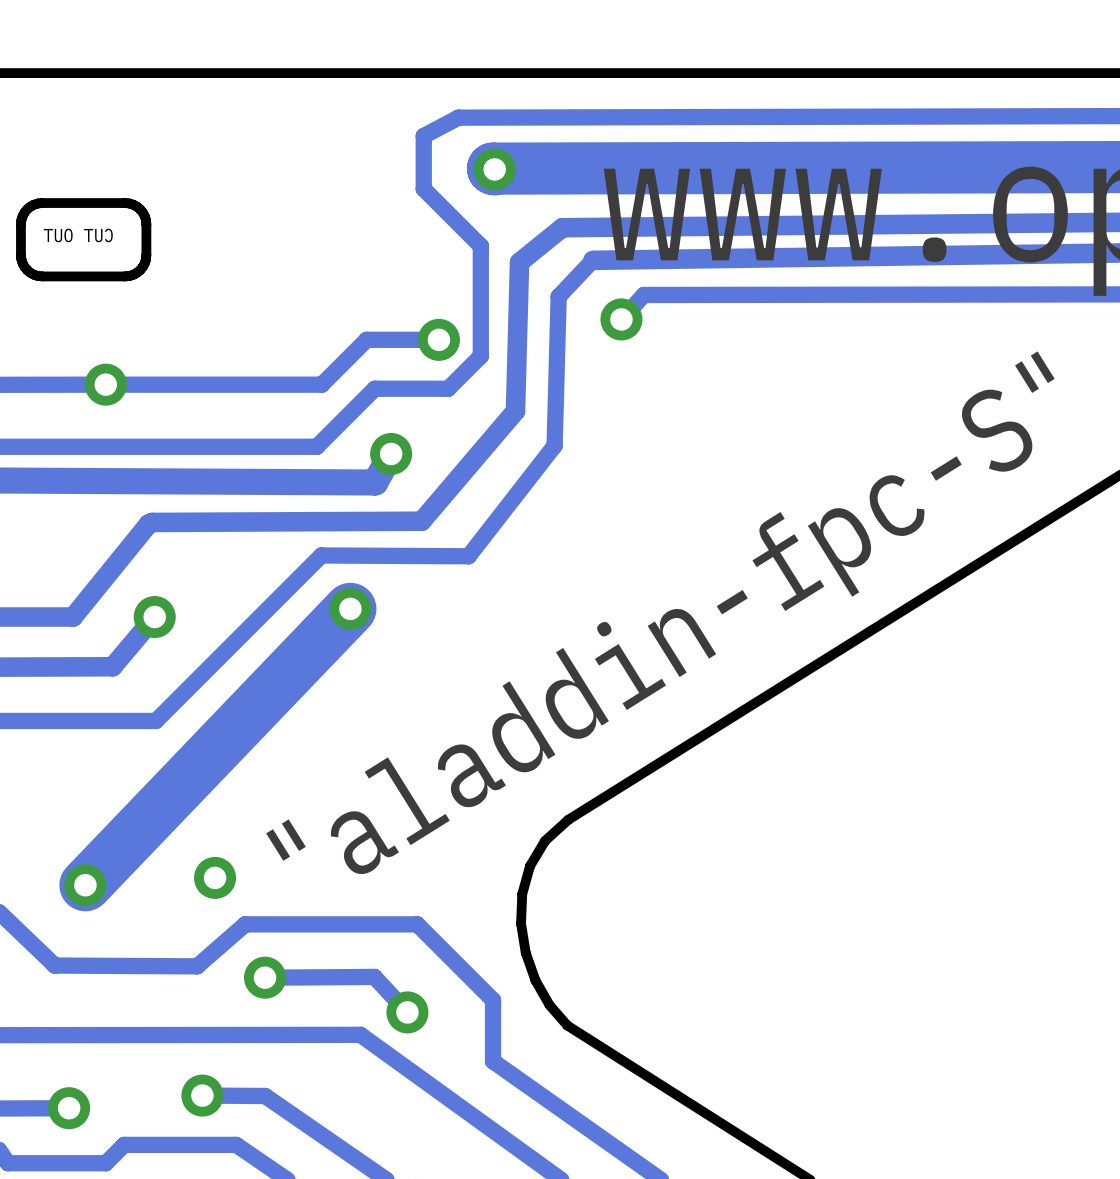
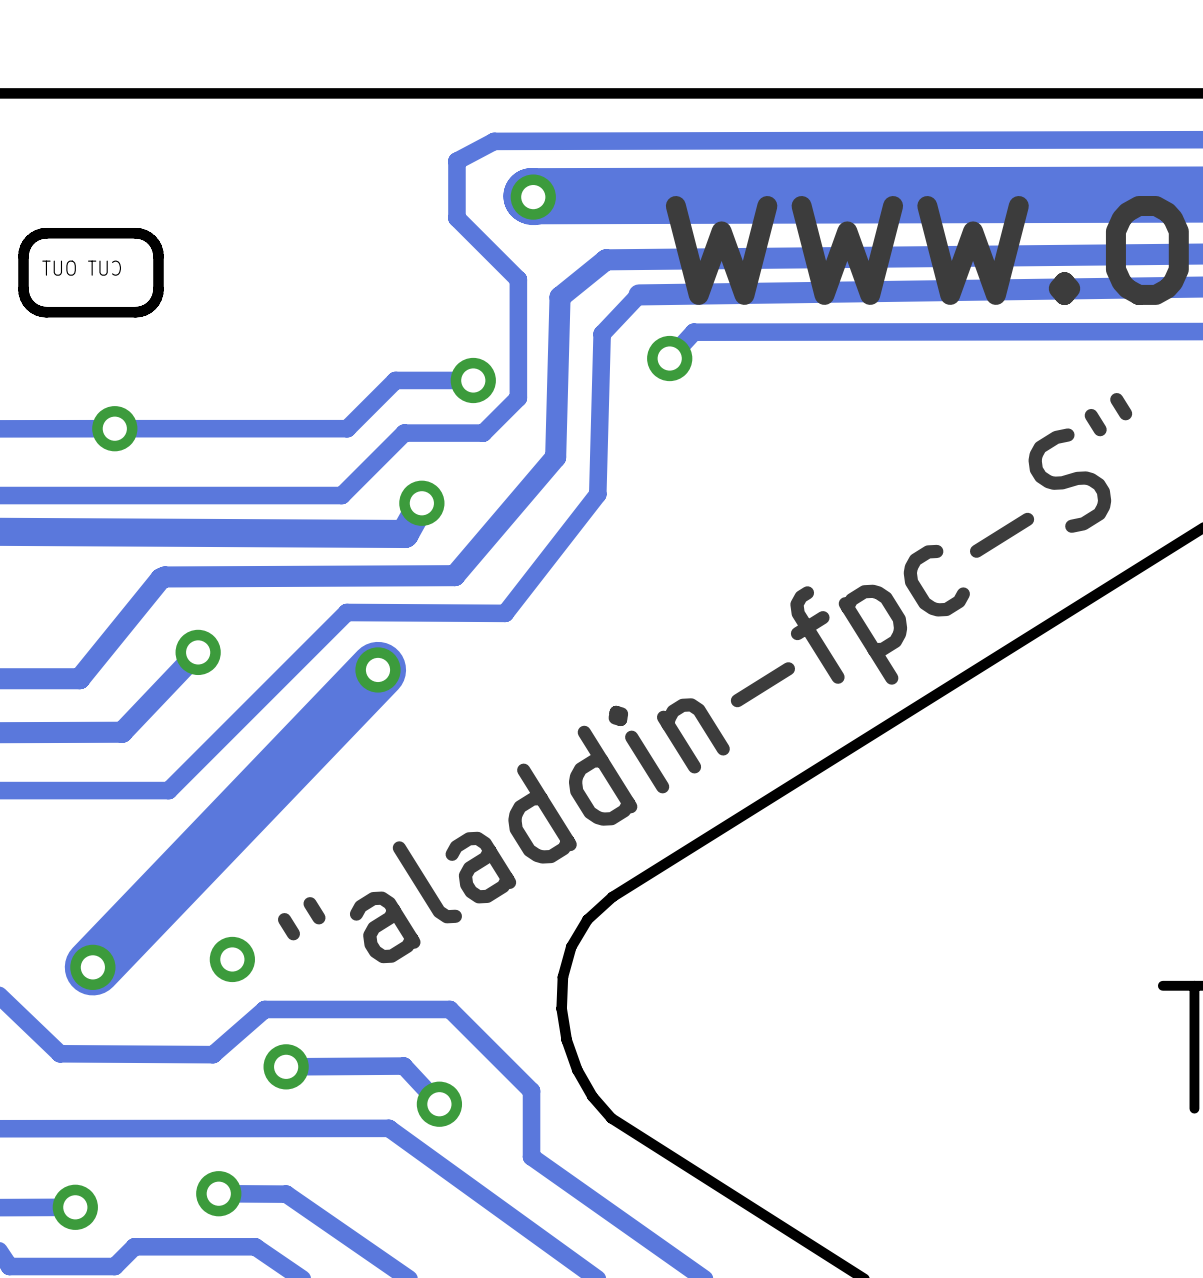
track: (154, 617) (112, 666) -> (198, 652) (122, 732)
via position: (154, 617) -> (198, 652)

